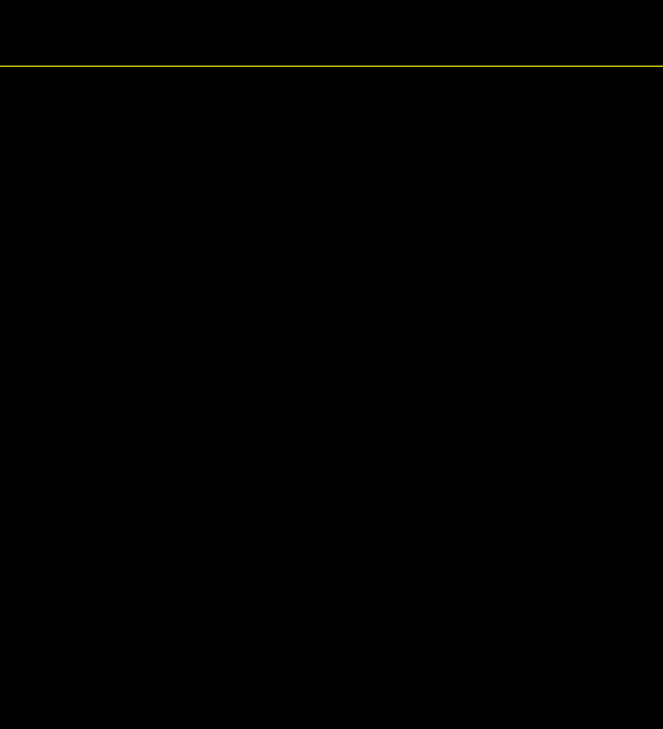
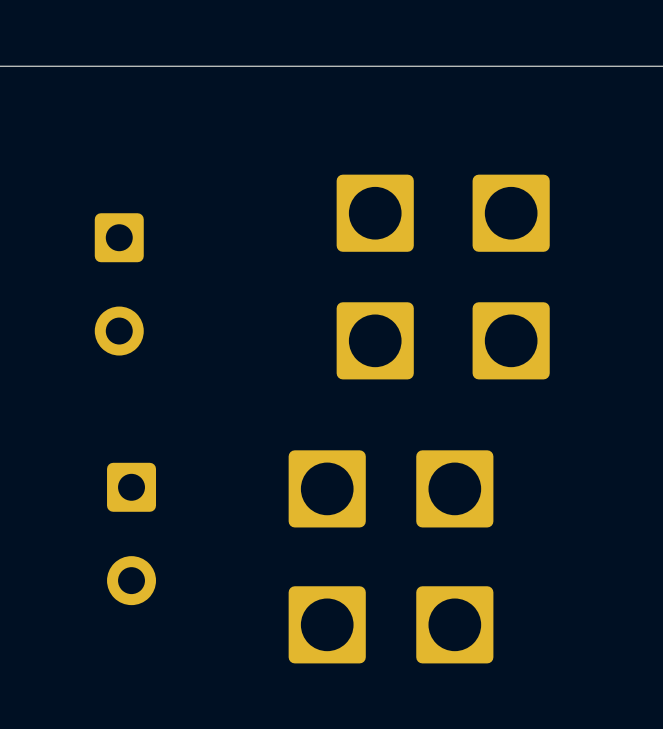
part: none -> (375, 213)
part: none -> (511, 213)
part: none -> (119, 284)
part: none -> (375, 340)
part: none -> (511, 340)
part: none -> (327, 488)
part: none -> (454, 488)
part: none -> (131, 533)
part: none -> (327, 624)
part: none -> (454, 624)

